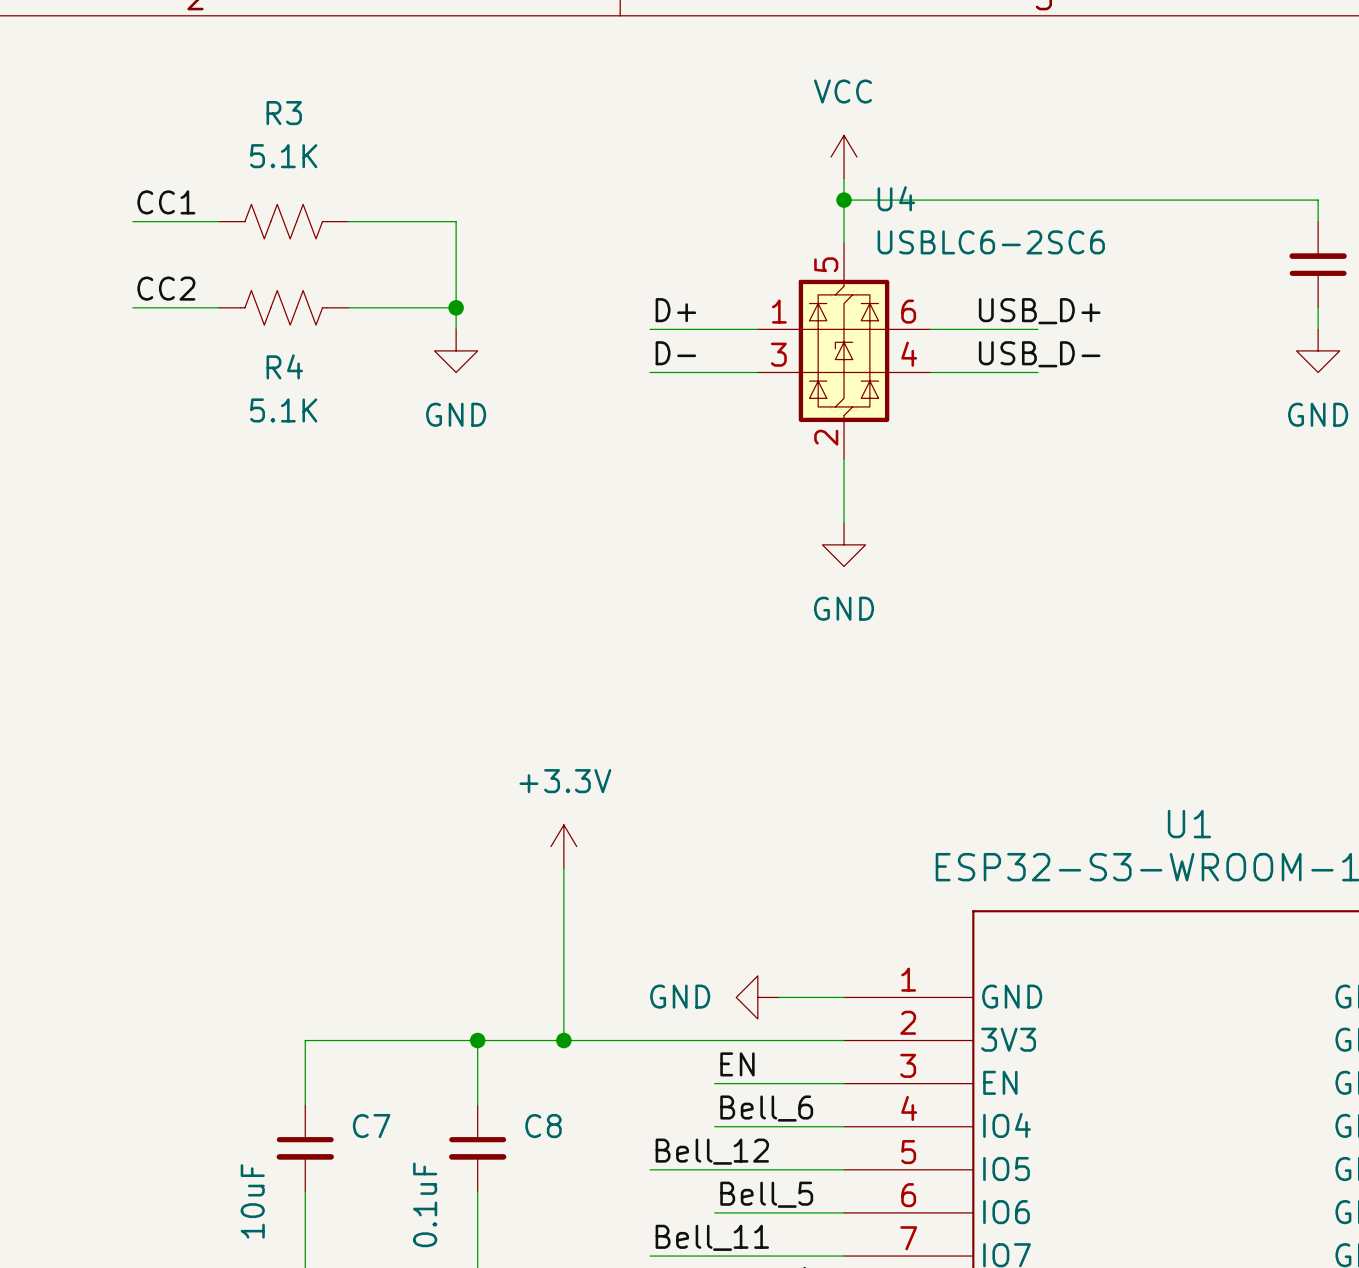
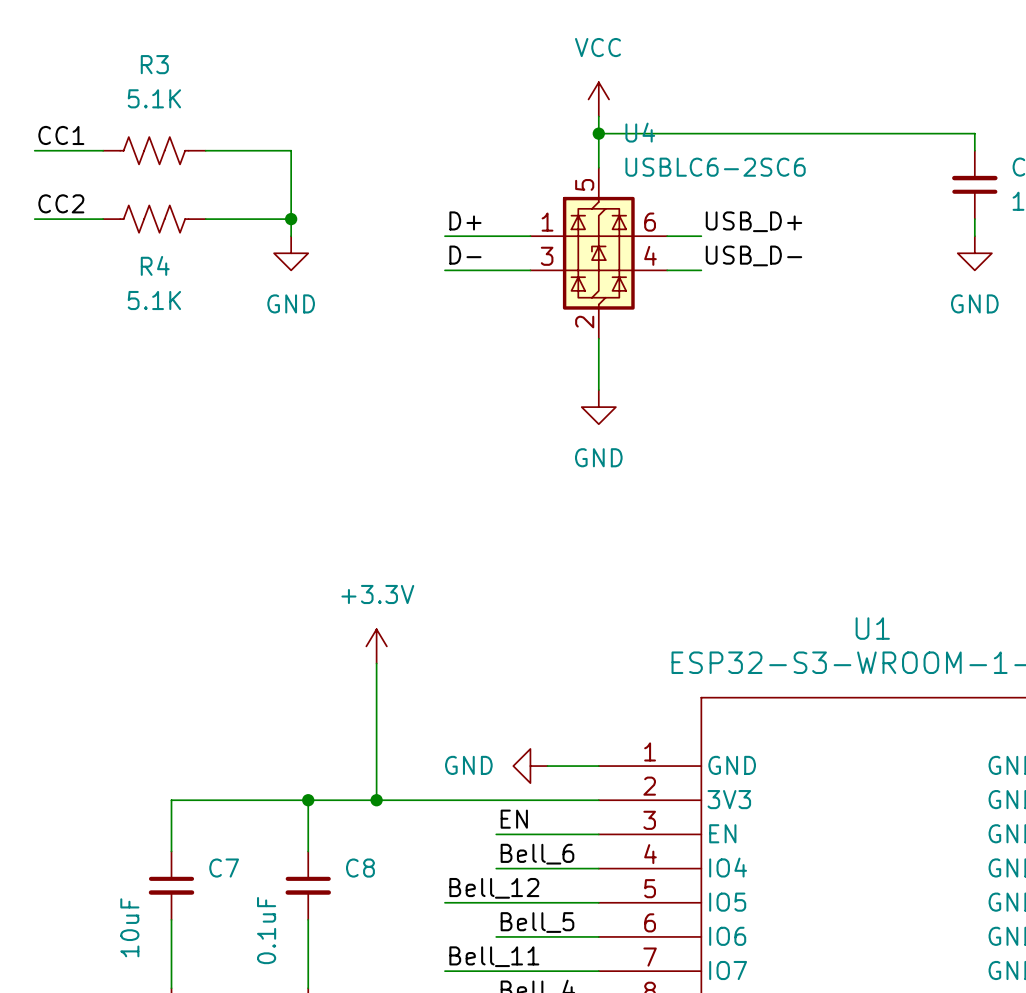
wire: (973, 329) (1037, 329) -> none
wire: (973, 372) (1037, 372) -> none

